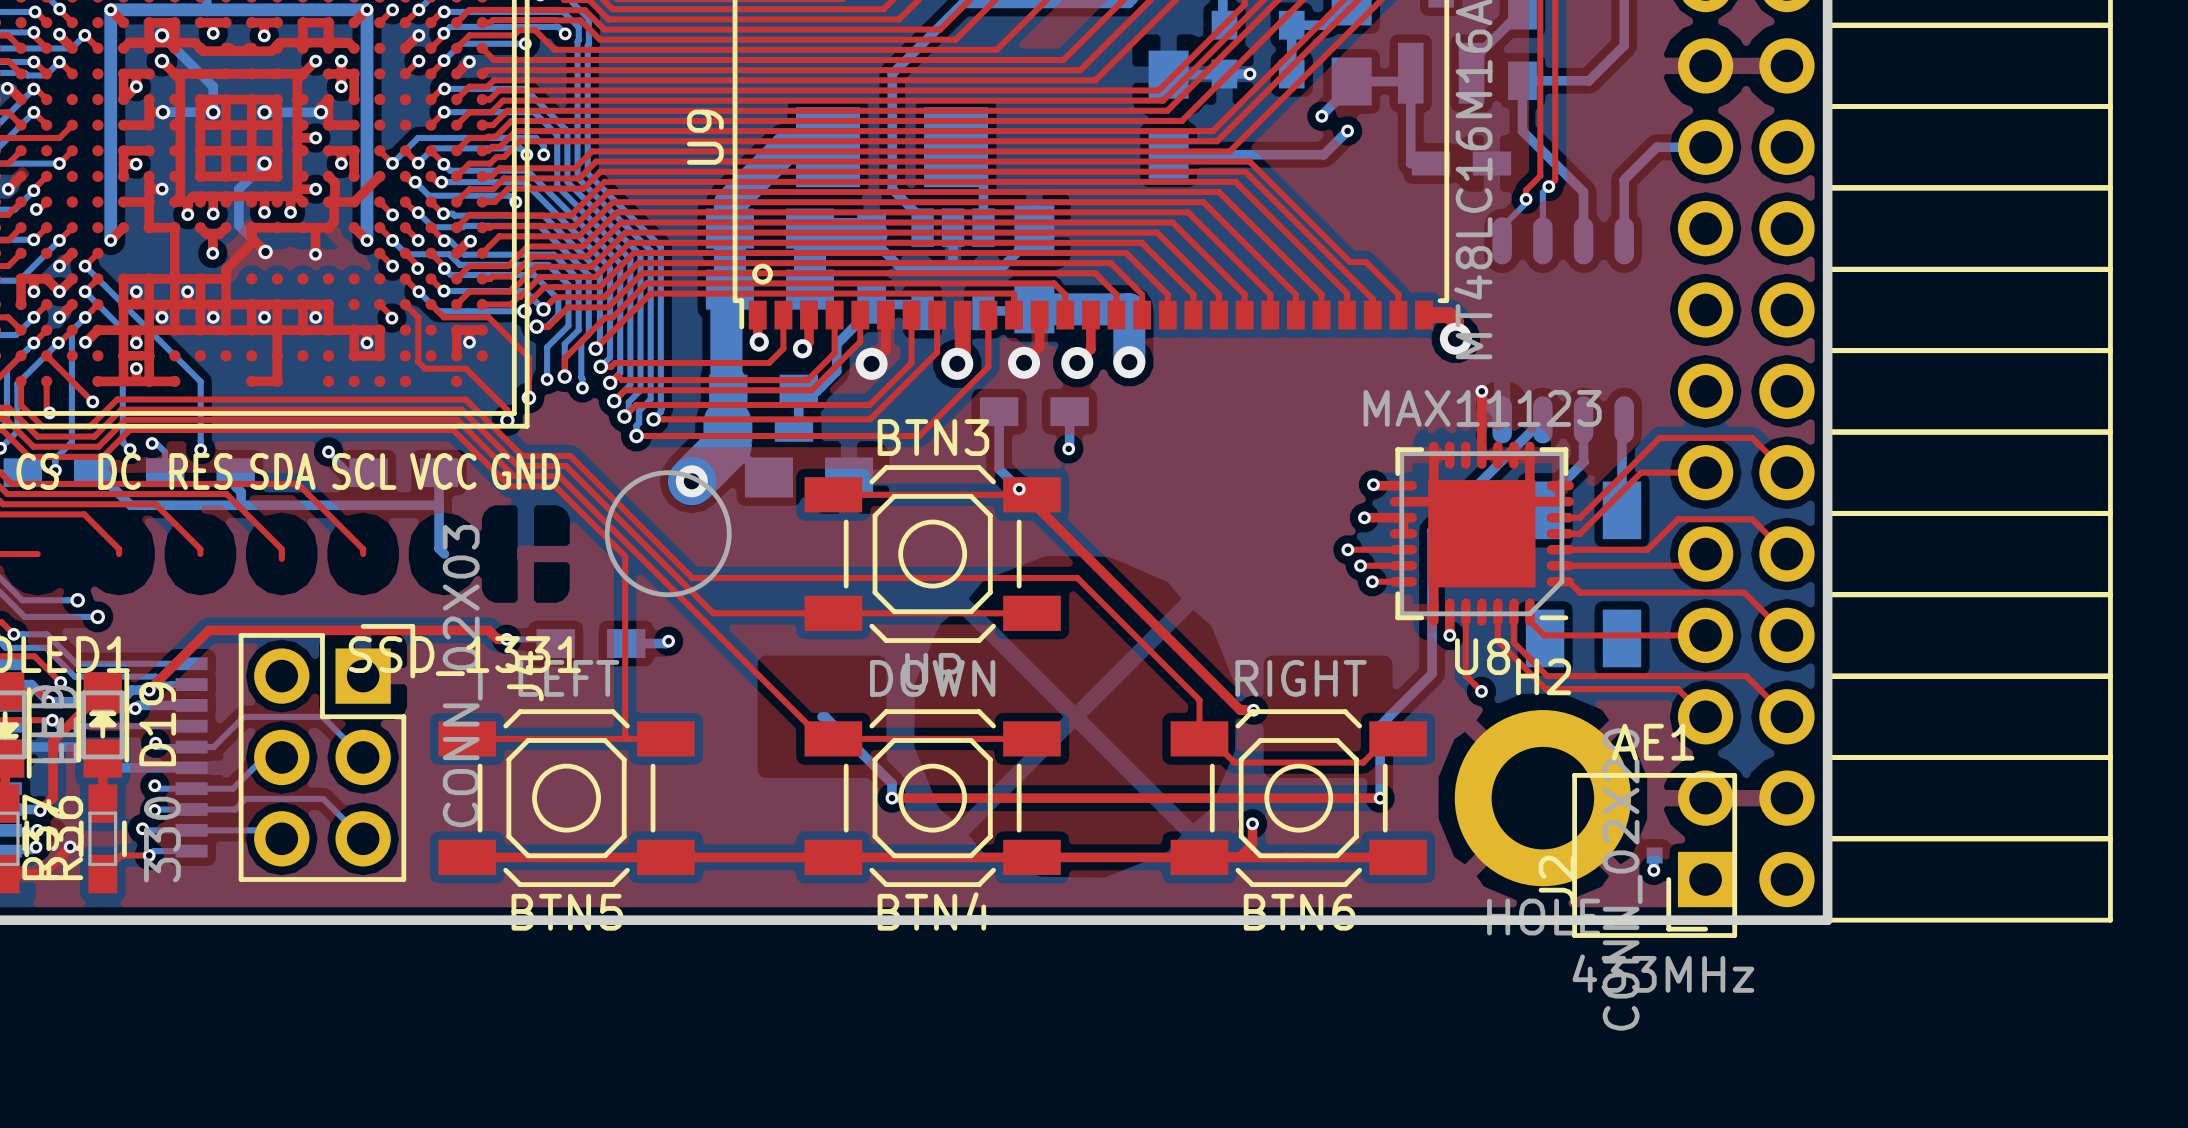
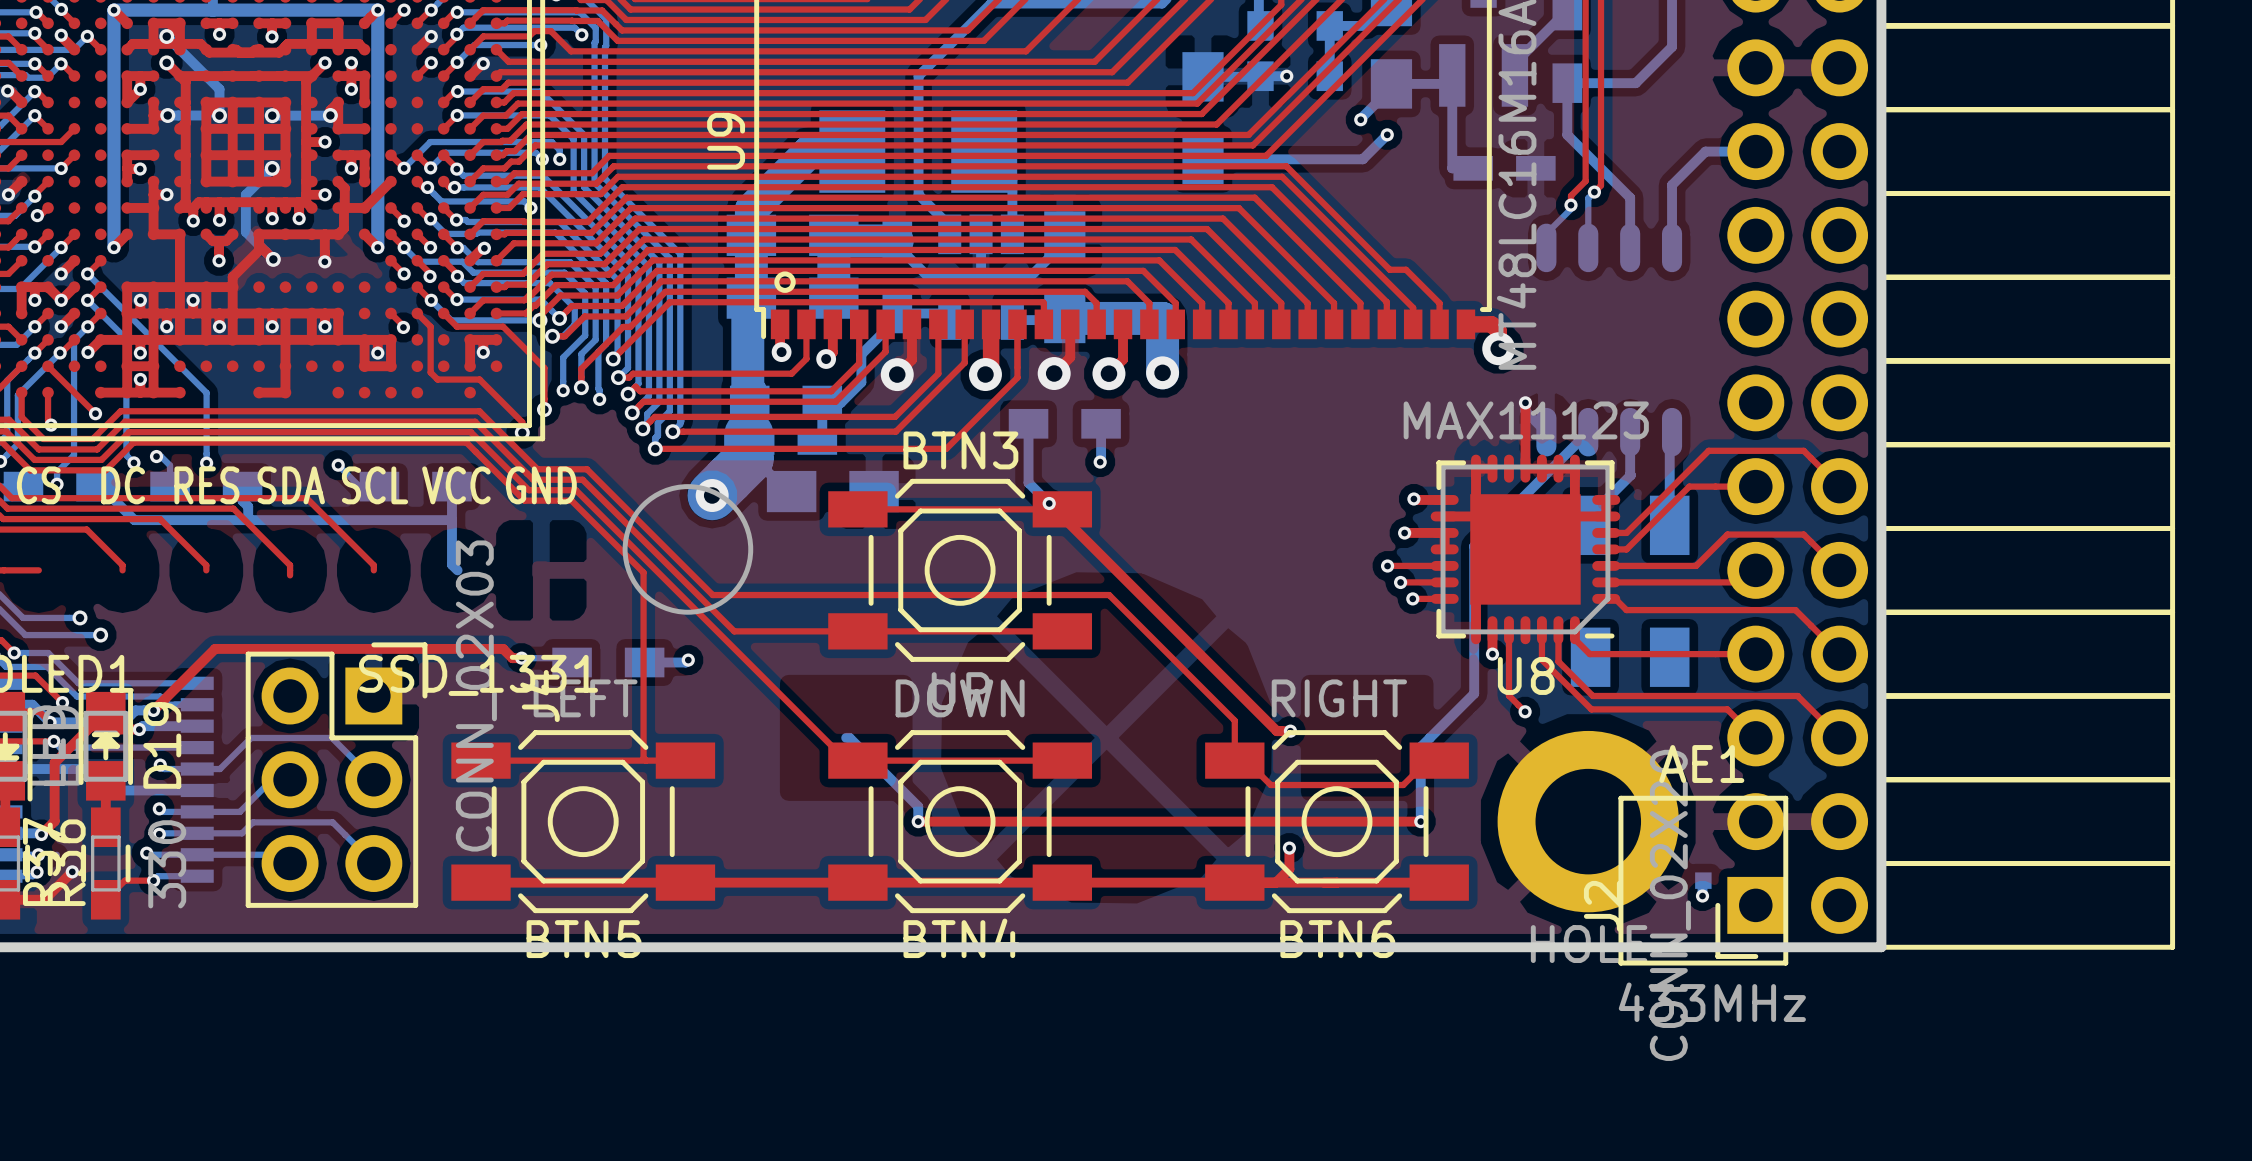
H2 name: H2 (1543, 676) -> none

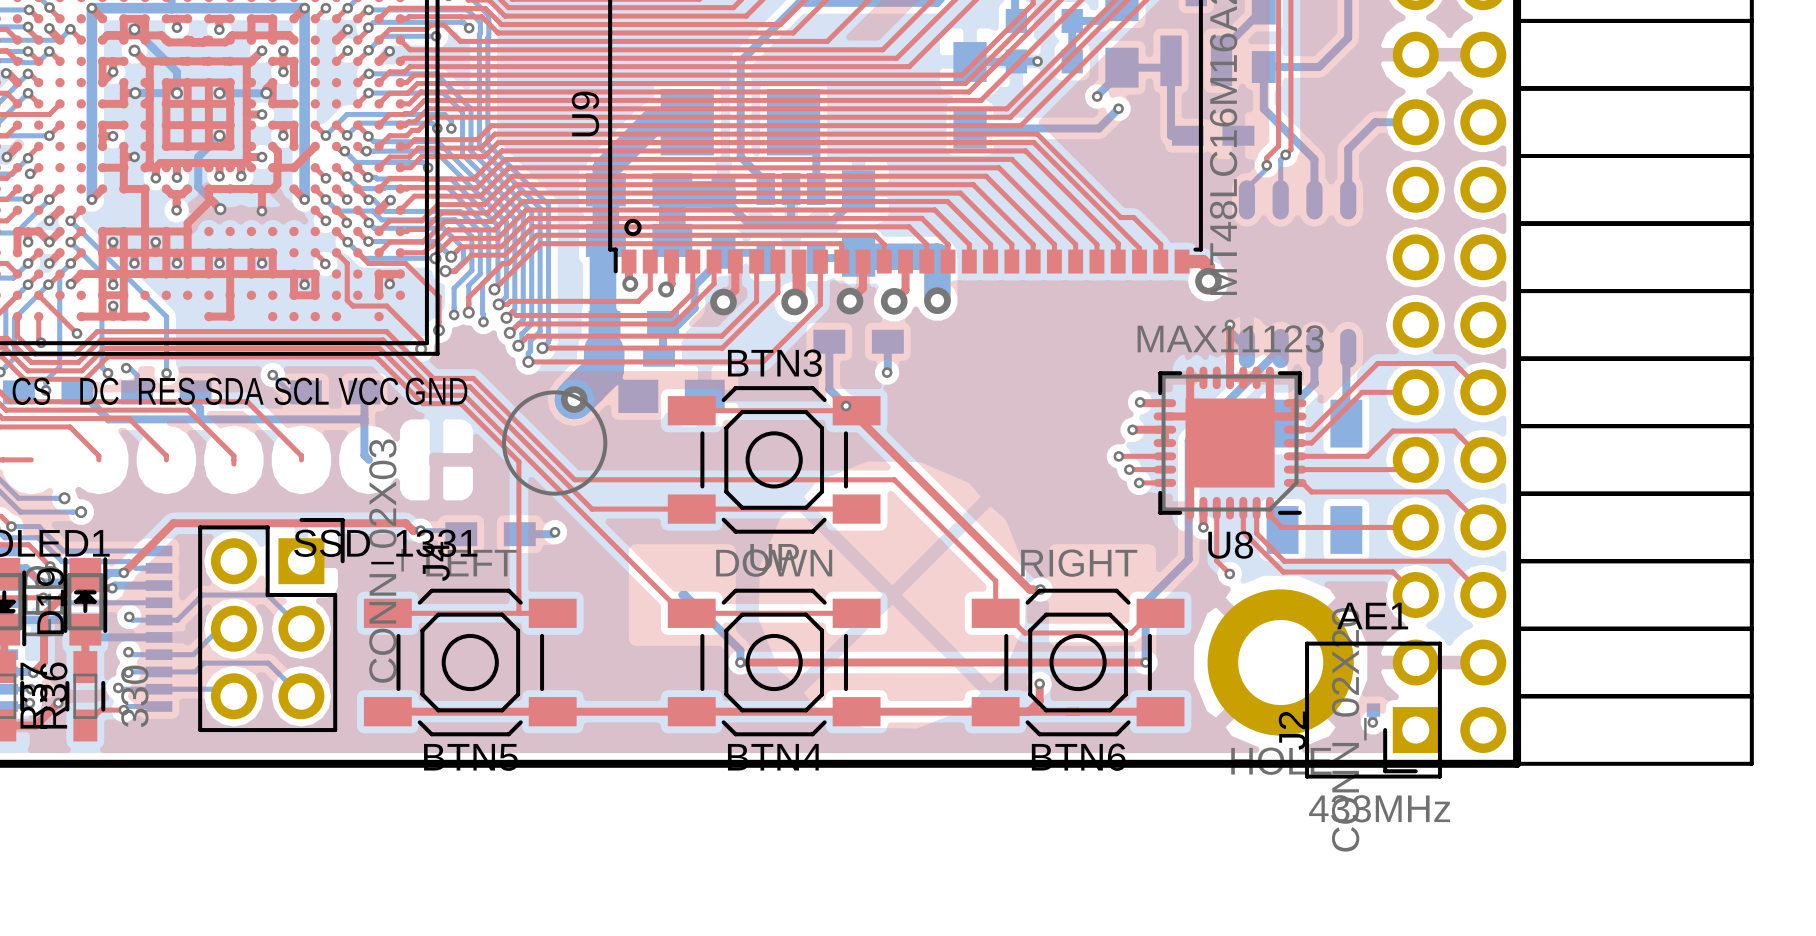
D19 name position: D19 (162, 745) -> D19 (50, 601)

